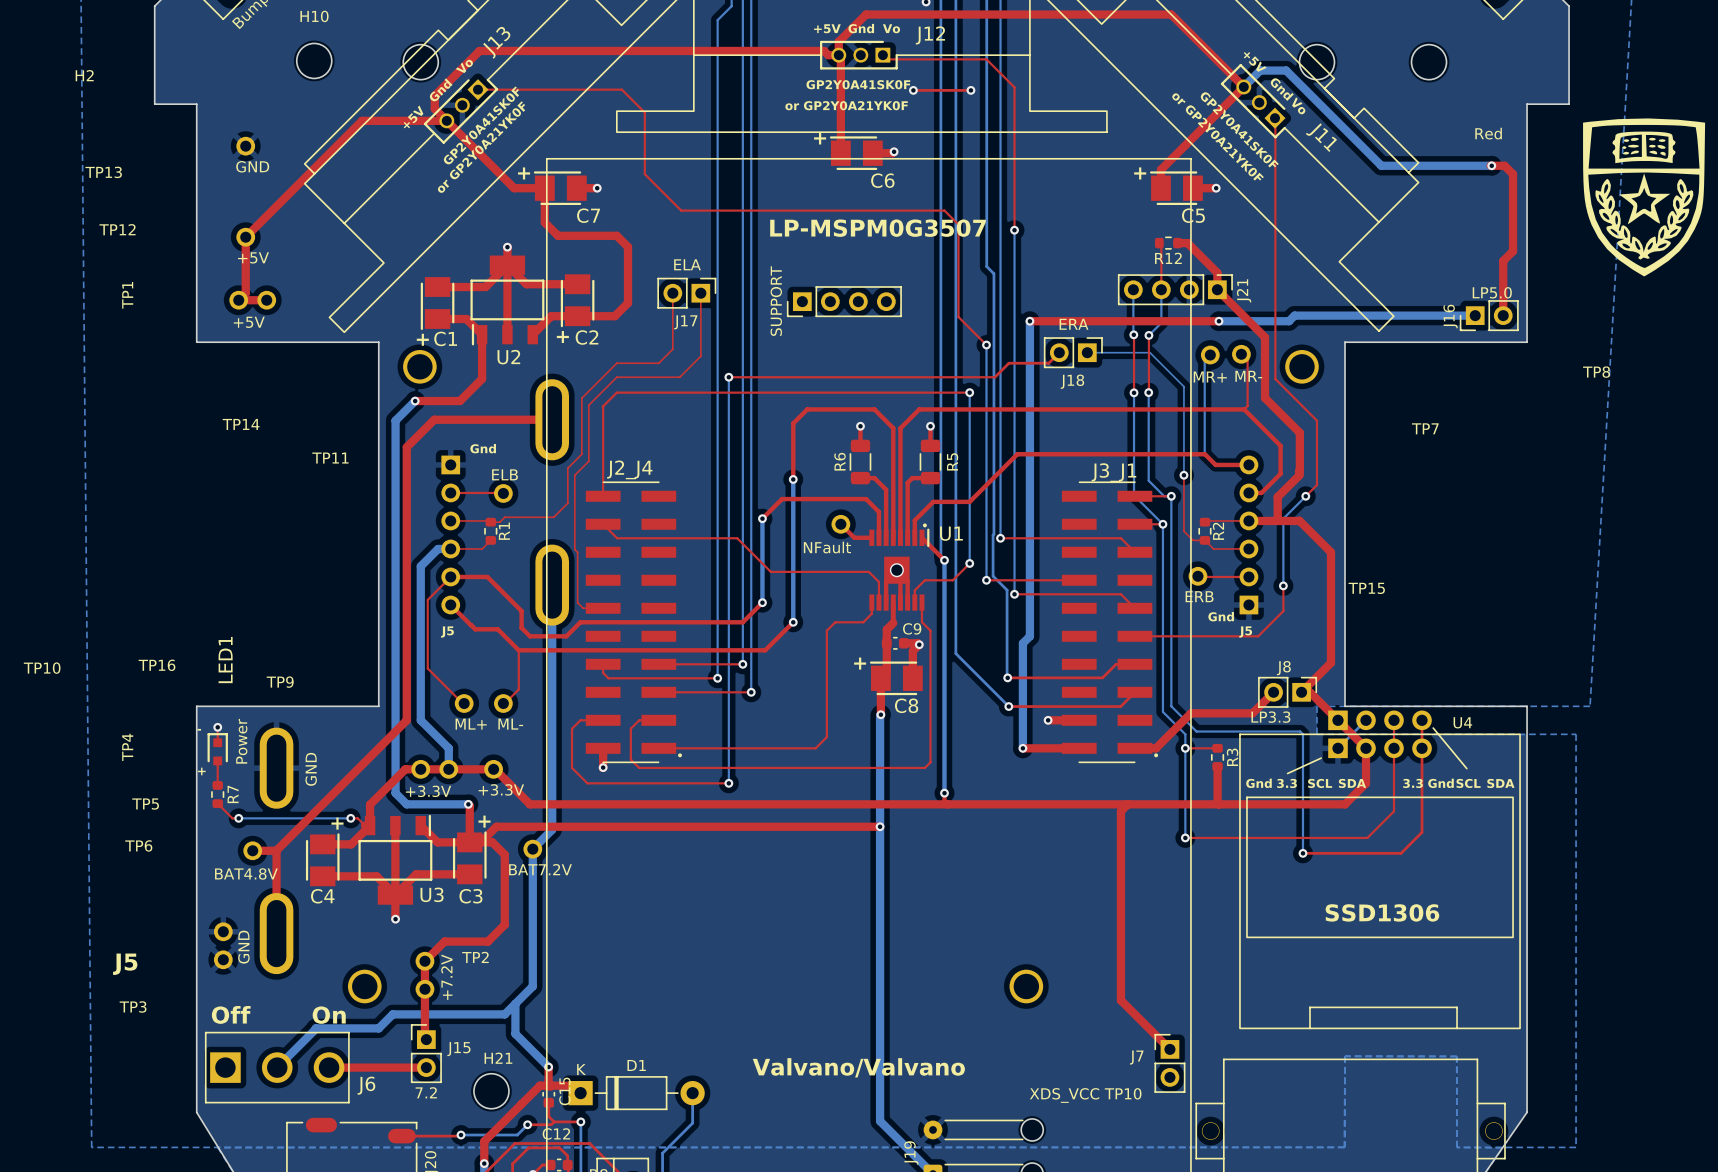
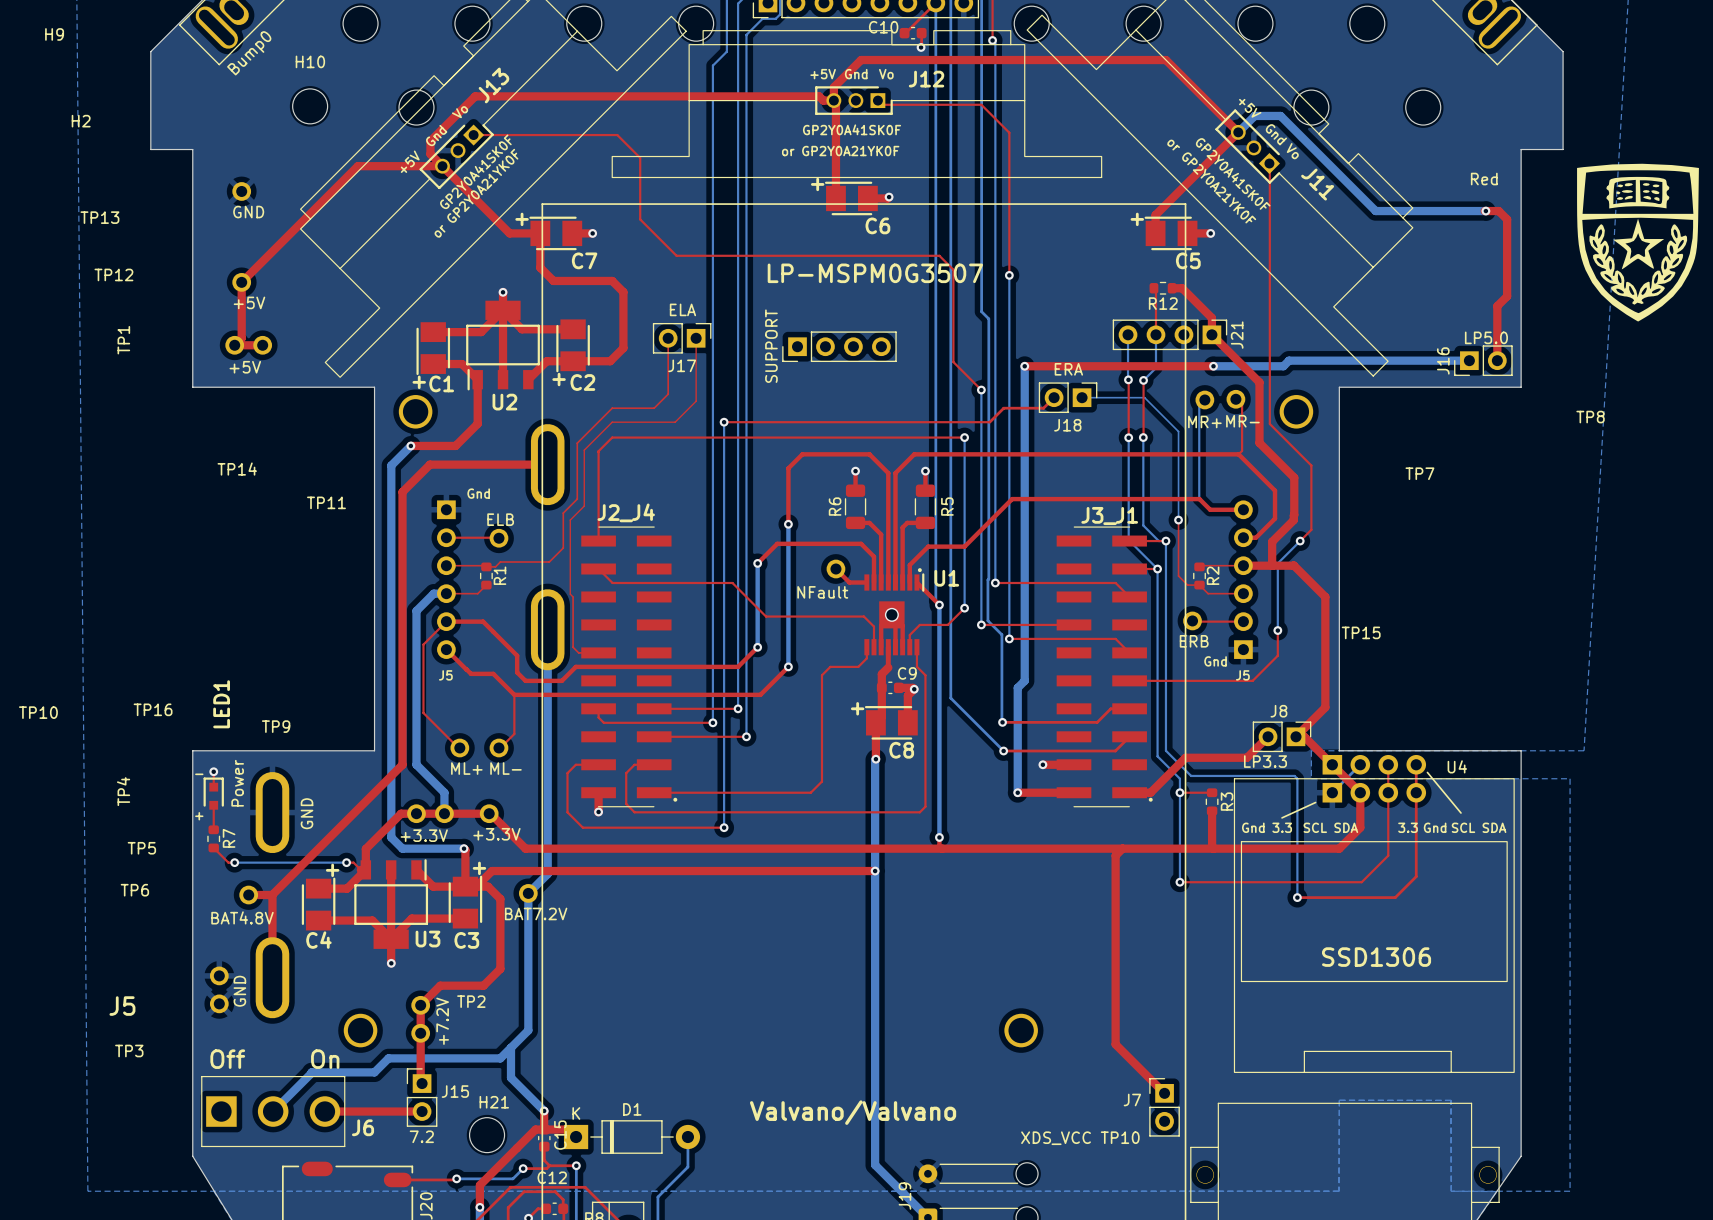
top track: (913, 90) (970, 90) -> none
via: (913, 90) -> none
via: (970, 90) -> none

